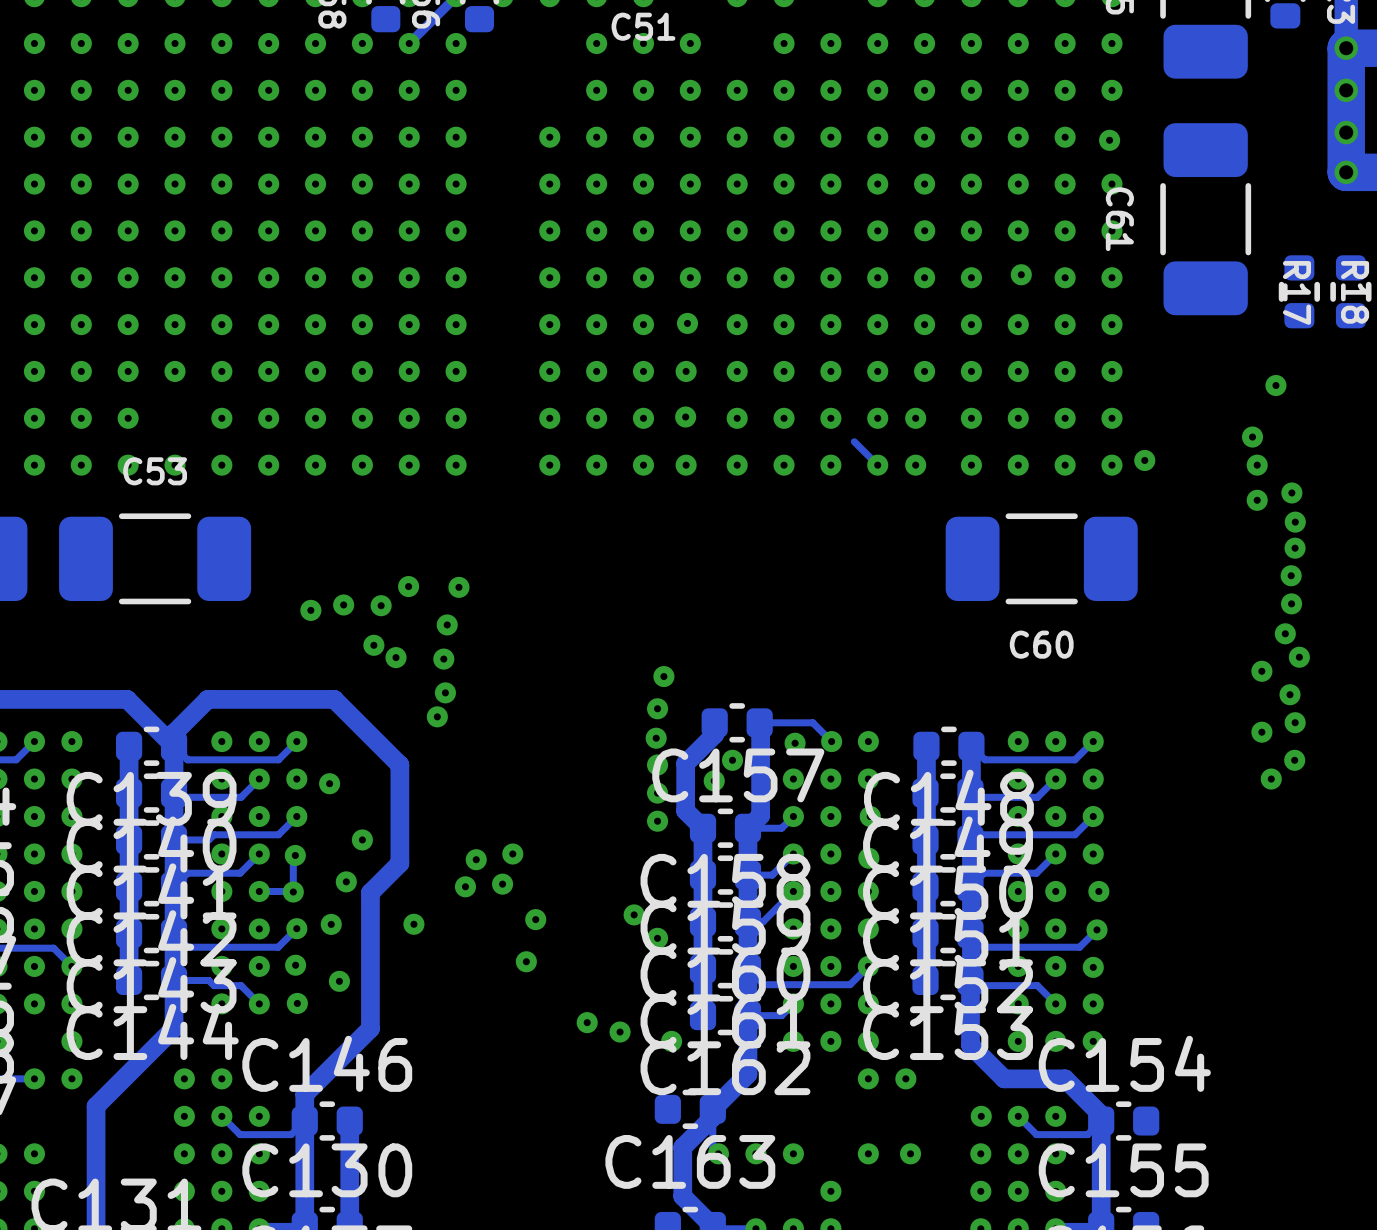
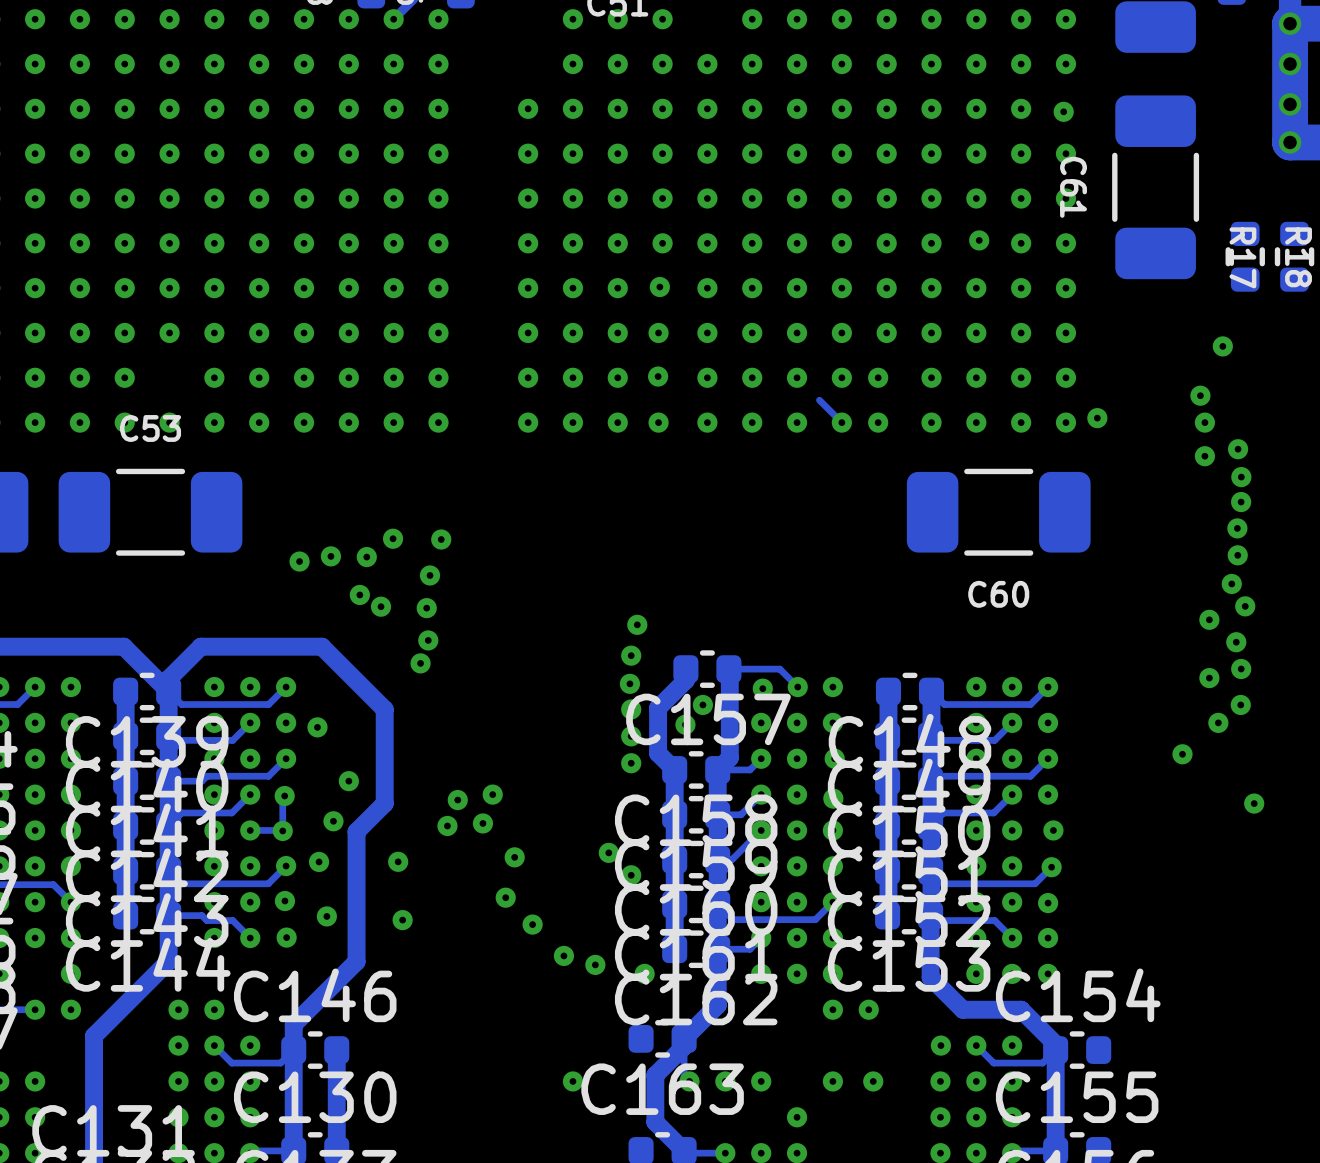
via: none -> (1182, 754)
via: none -> (1254, 803)
via: none -> (402, 920)
via: none -> (532, 924)
via: none -> (572, 1081)

